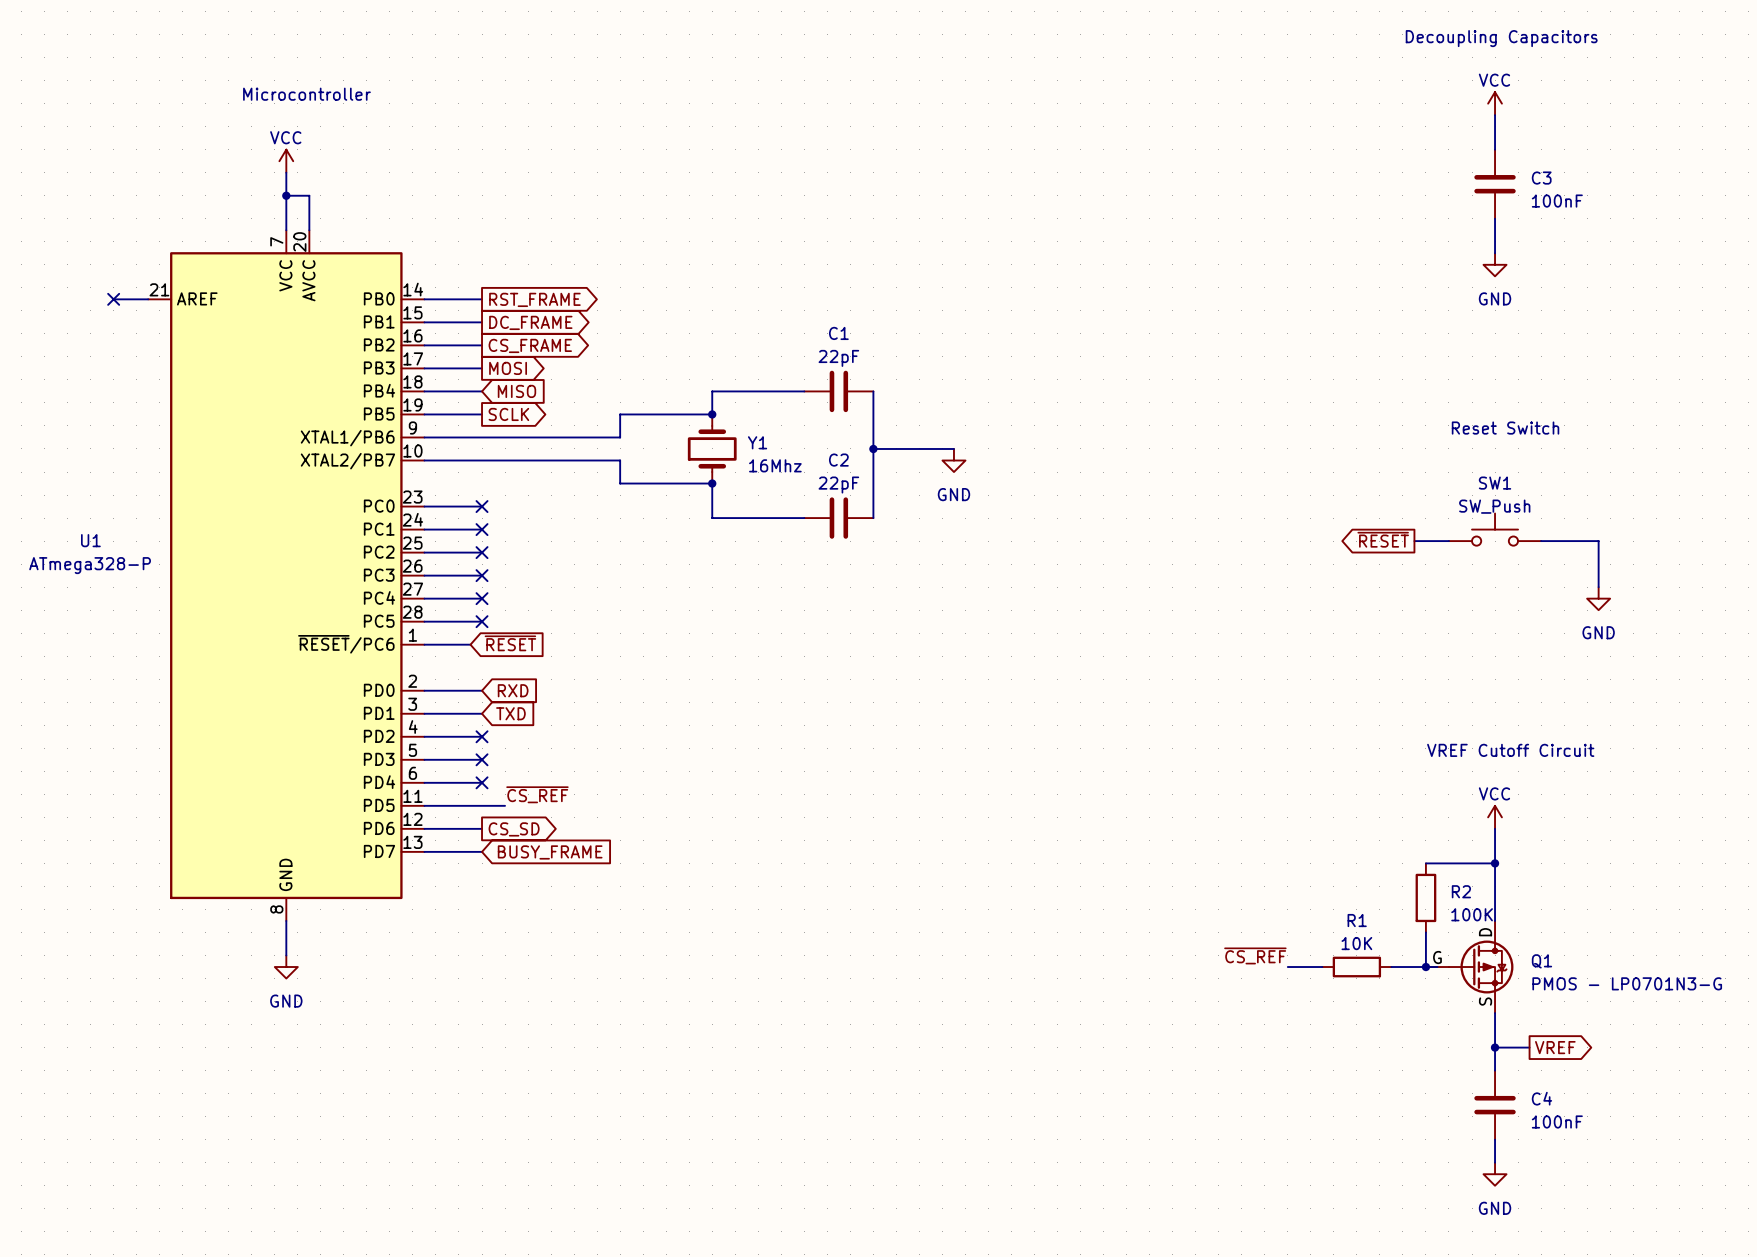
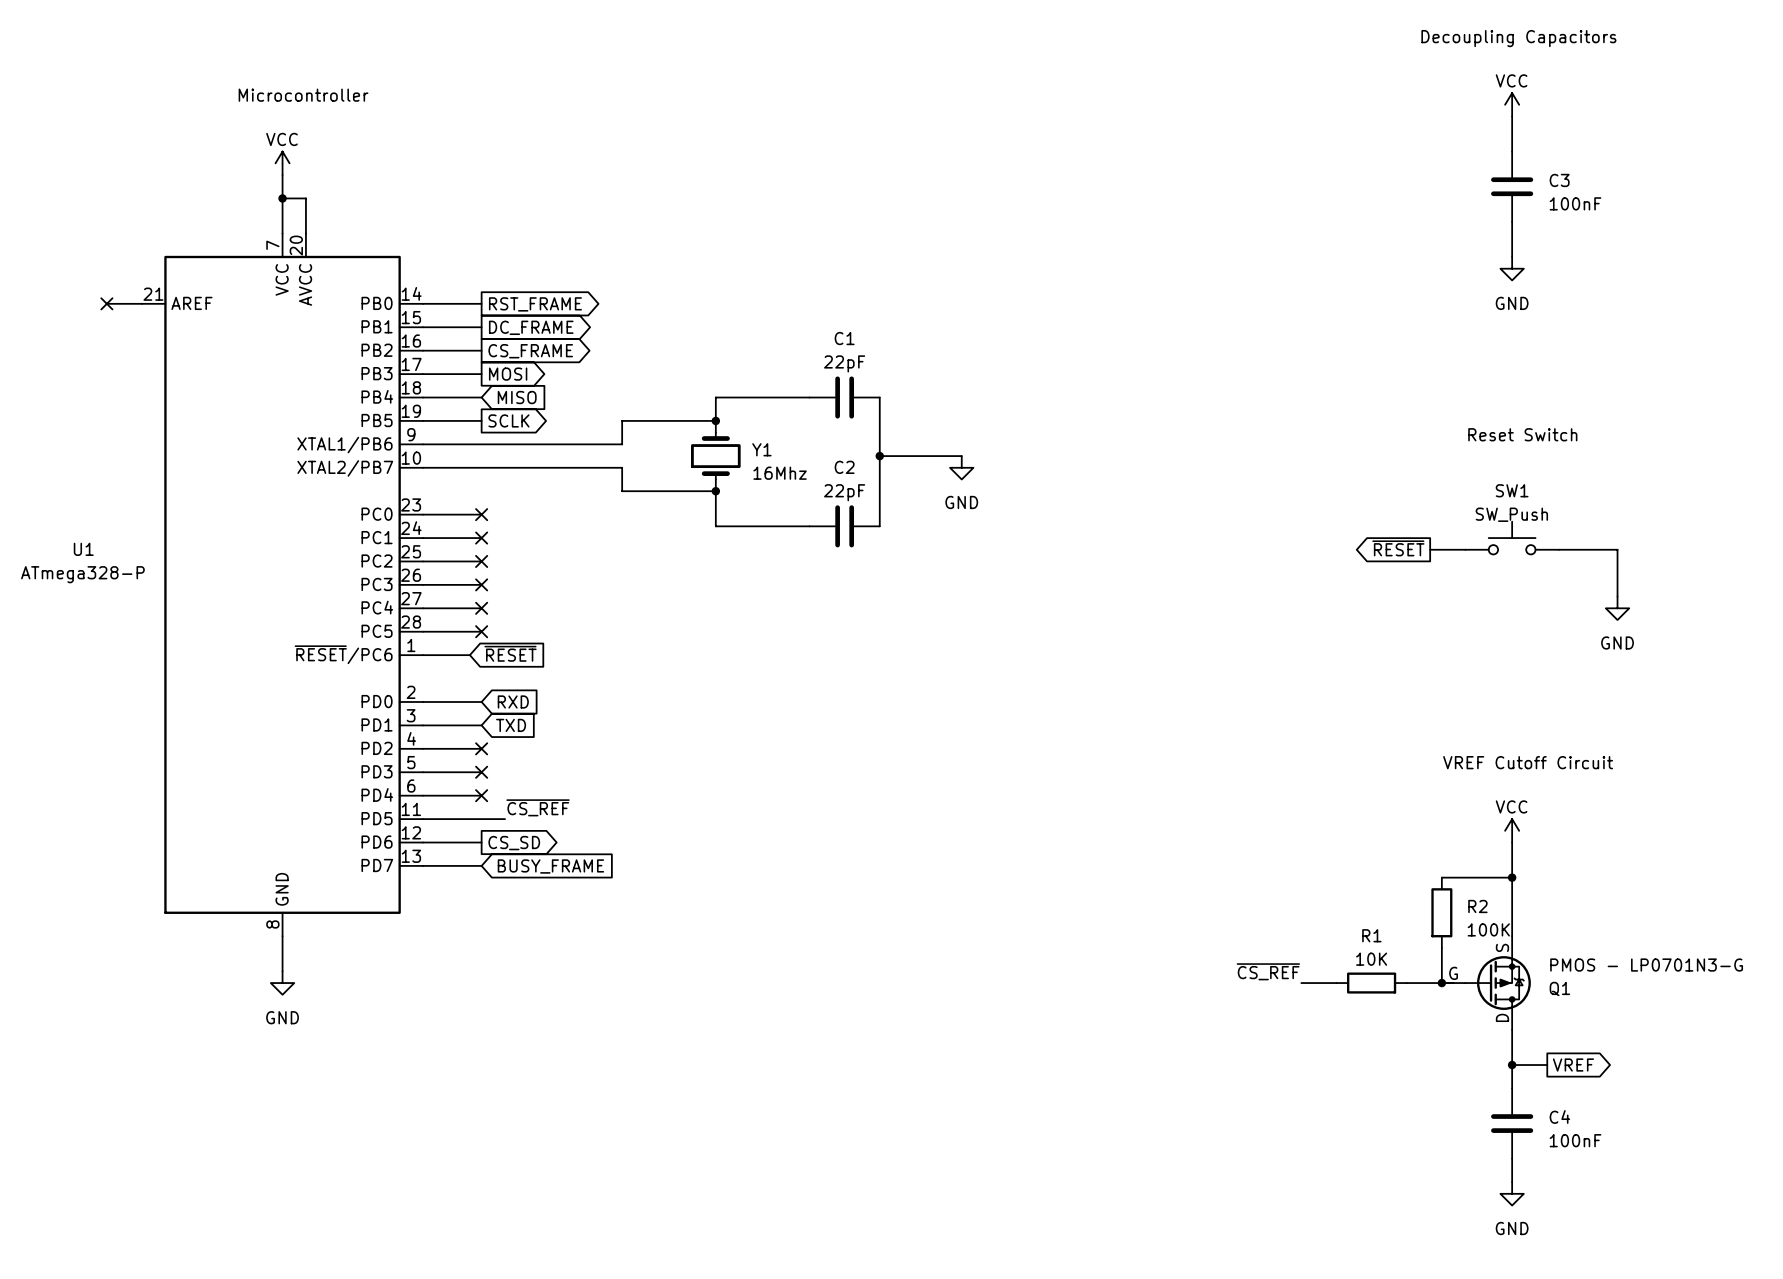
Q1 flip: as is (1481, 967) -> up-down (1498, 983)

